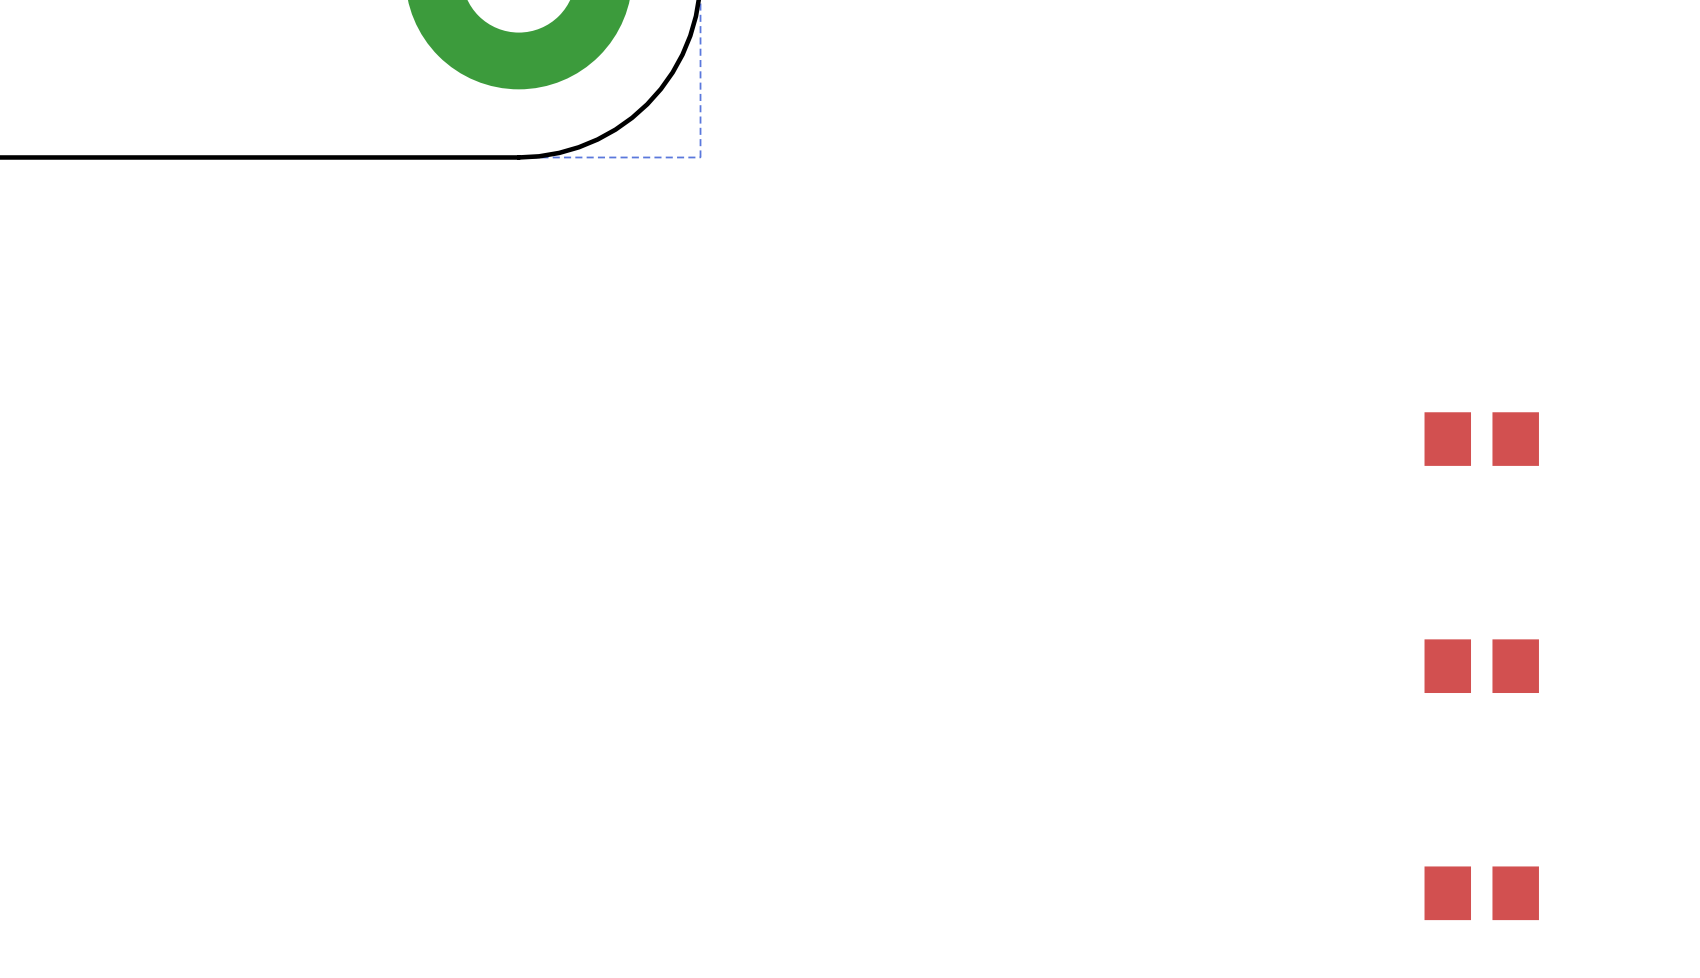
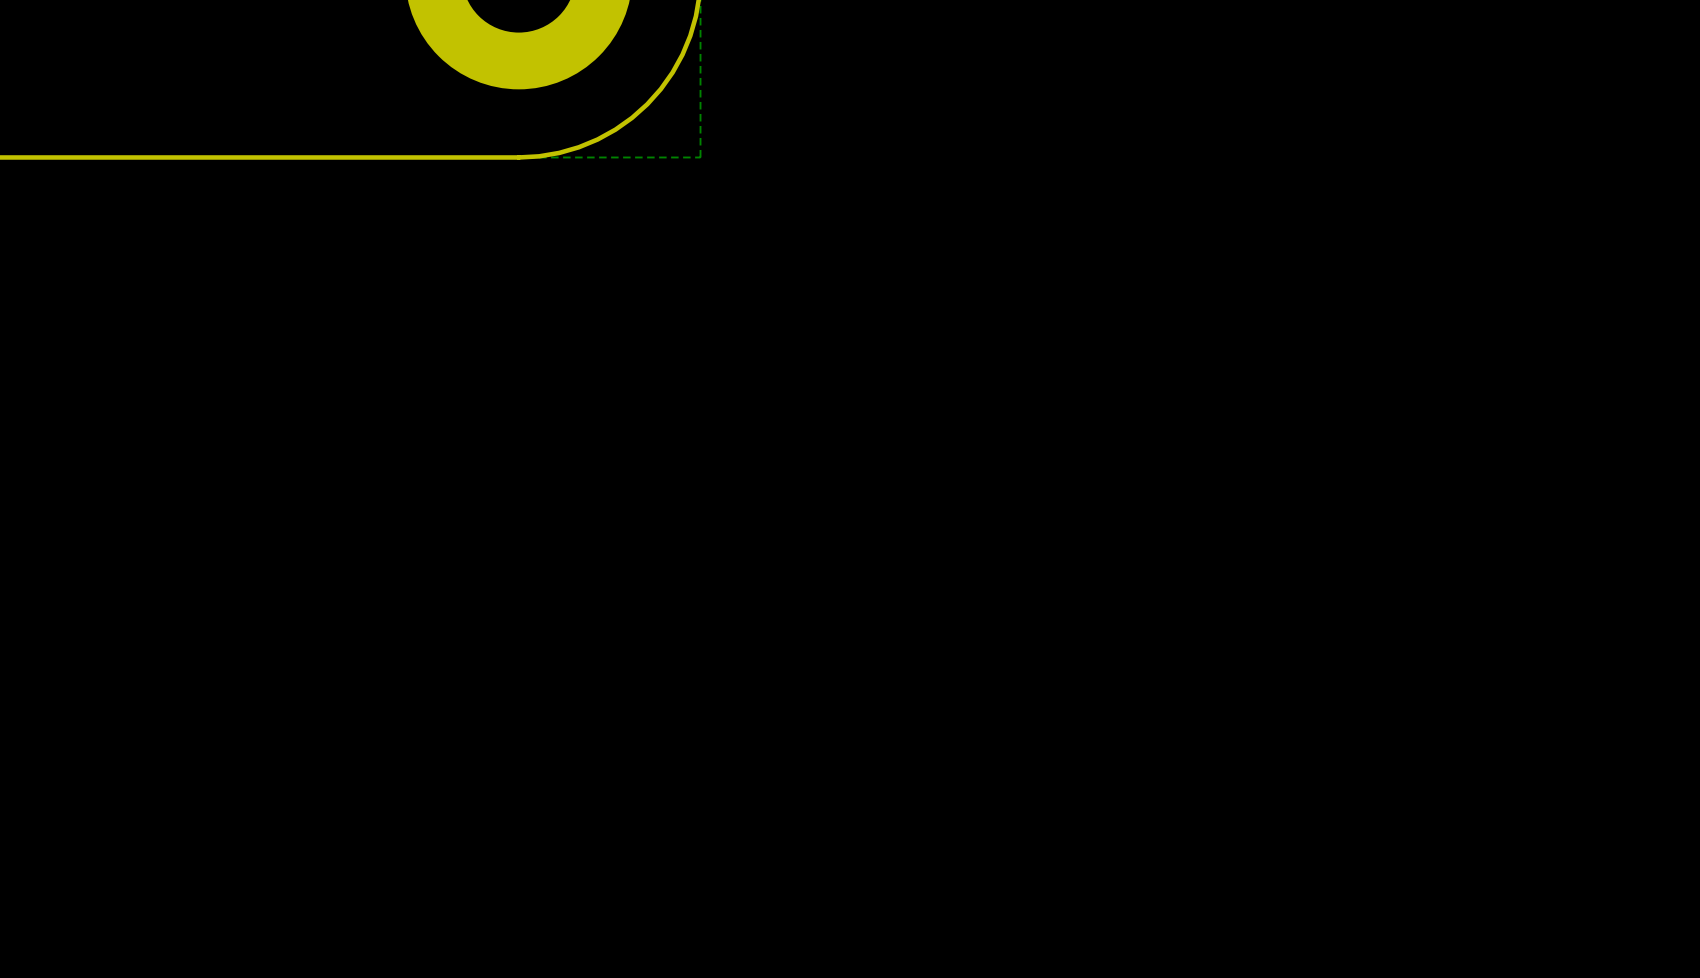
part: (1481, 439) -> none
part: (1481, 666) -> none
part: (1481, 893) -> none

